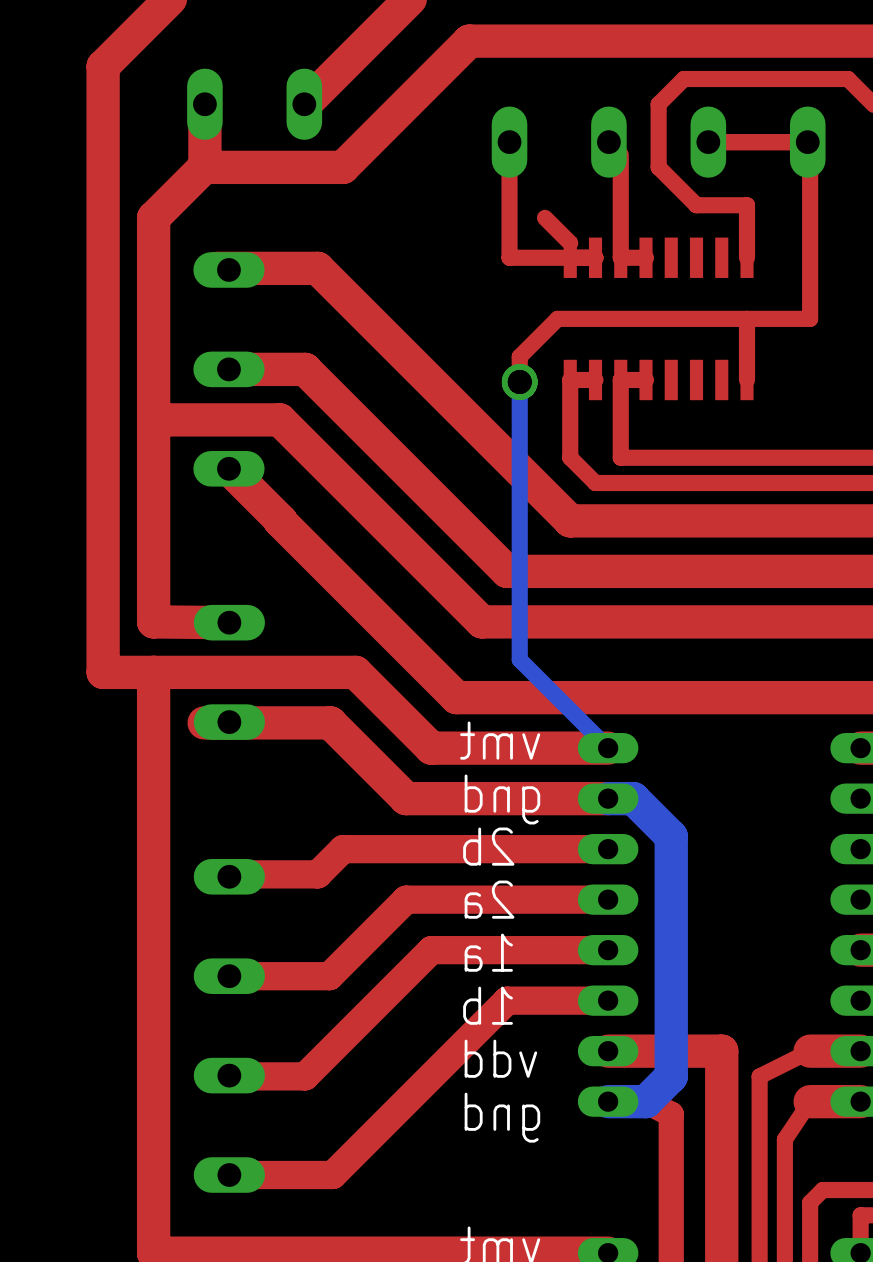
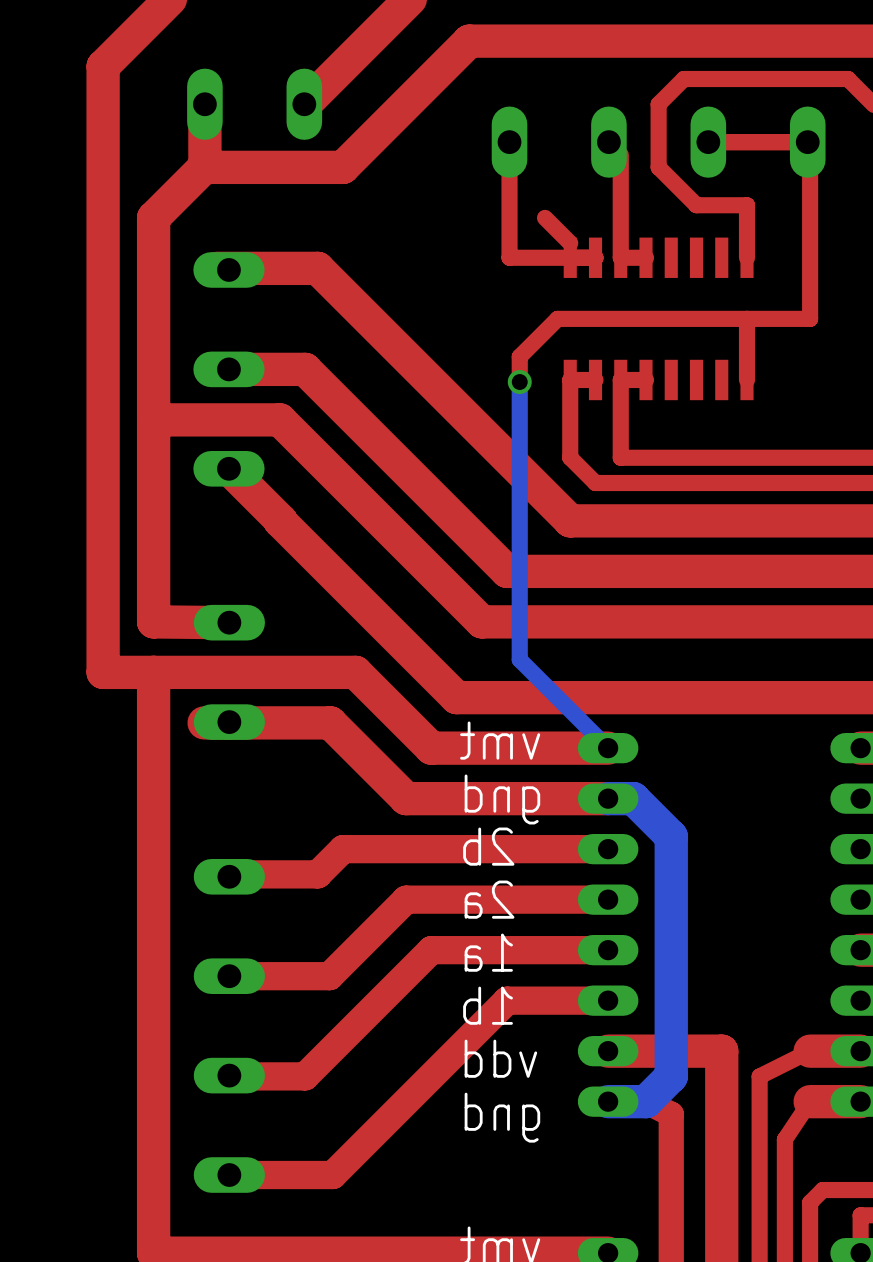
via: (519, 382) -> none
via: none -> (519, 382)

